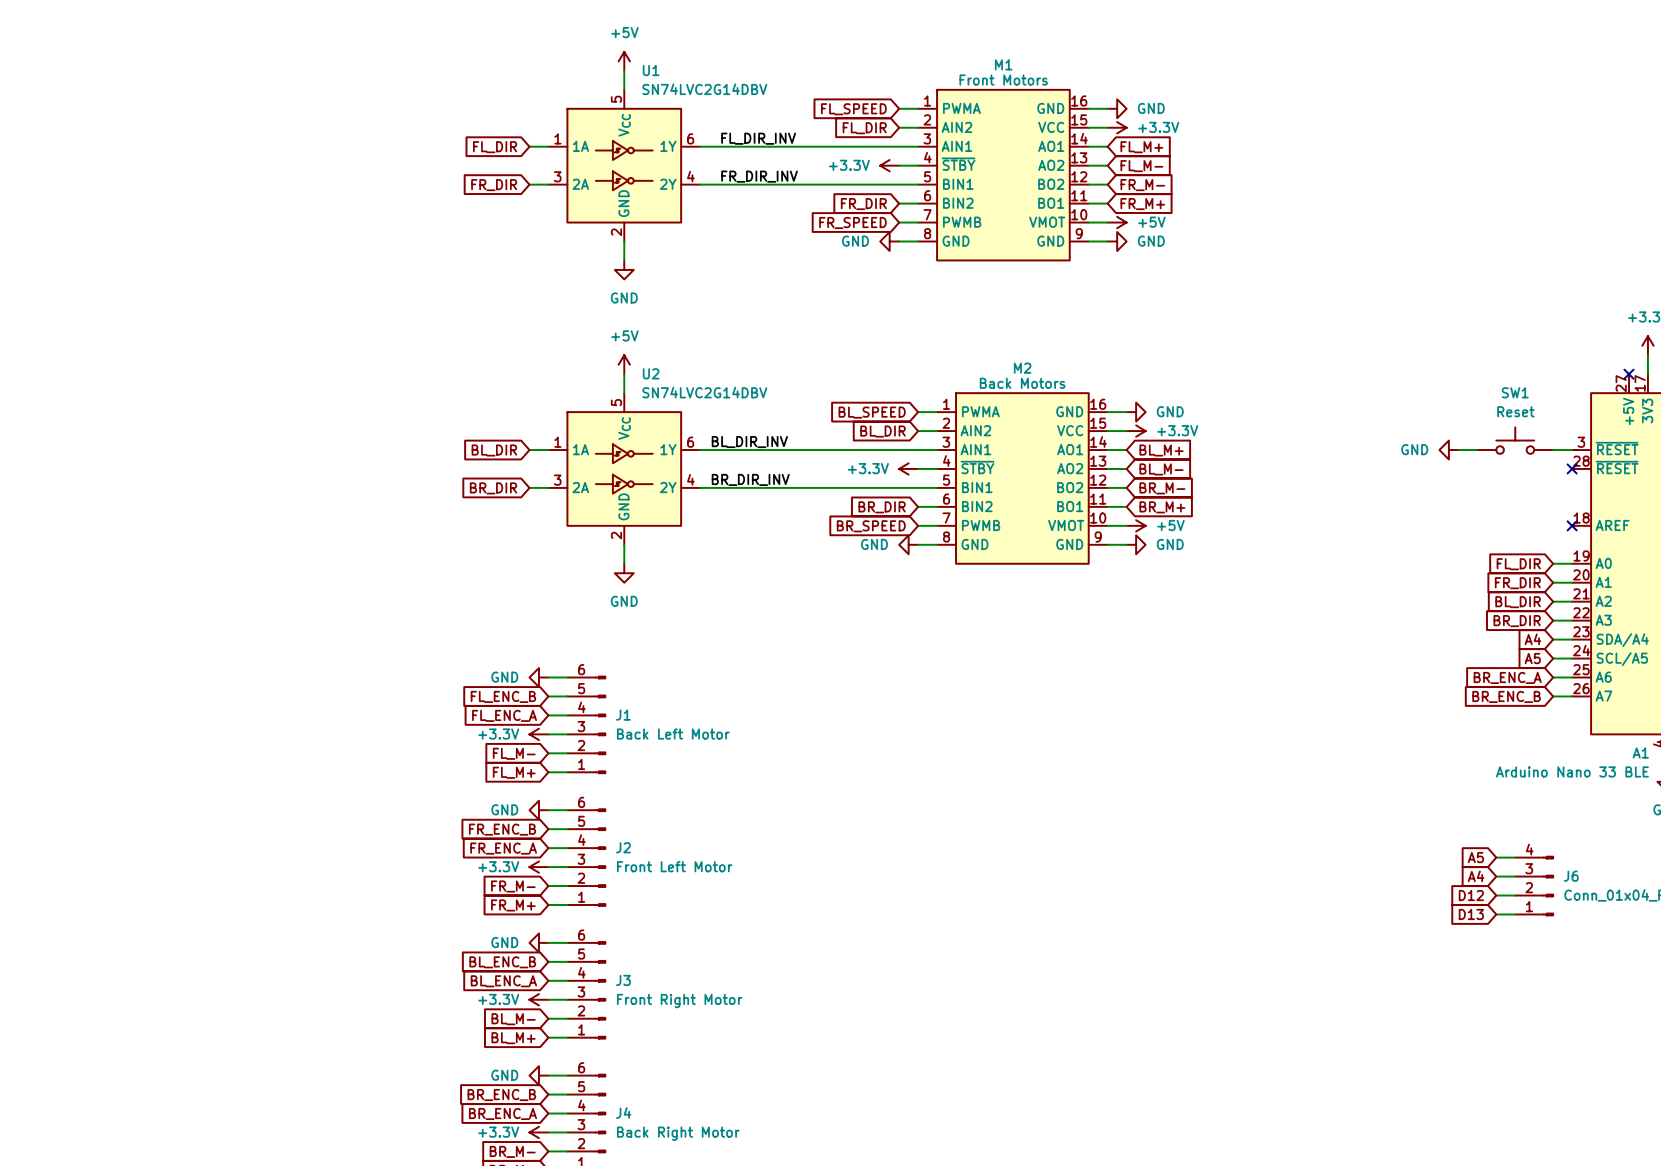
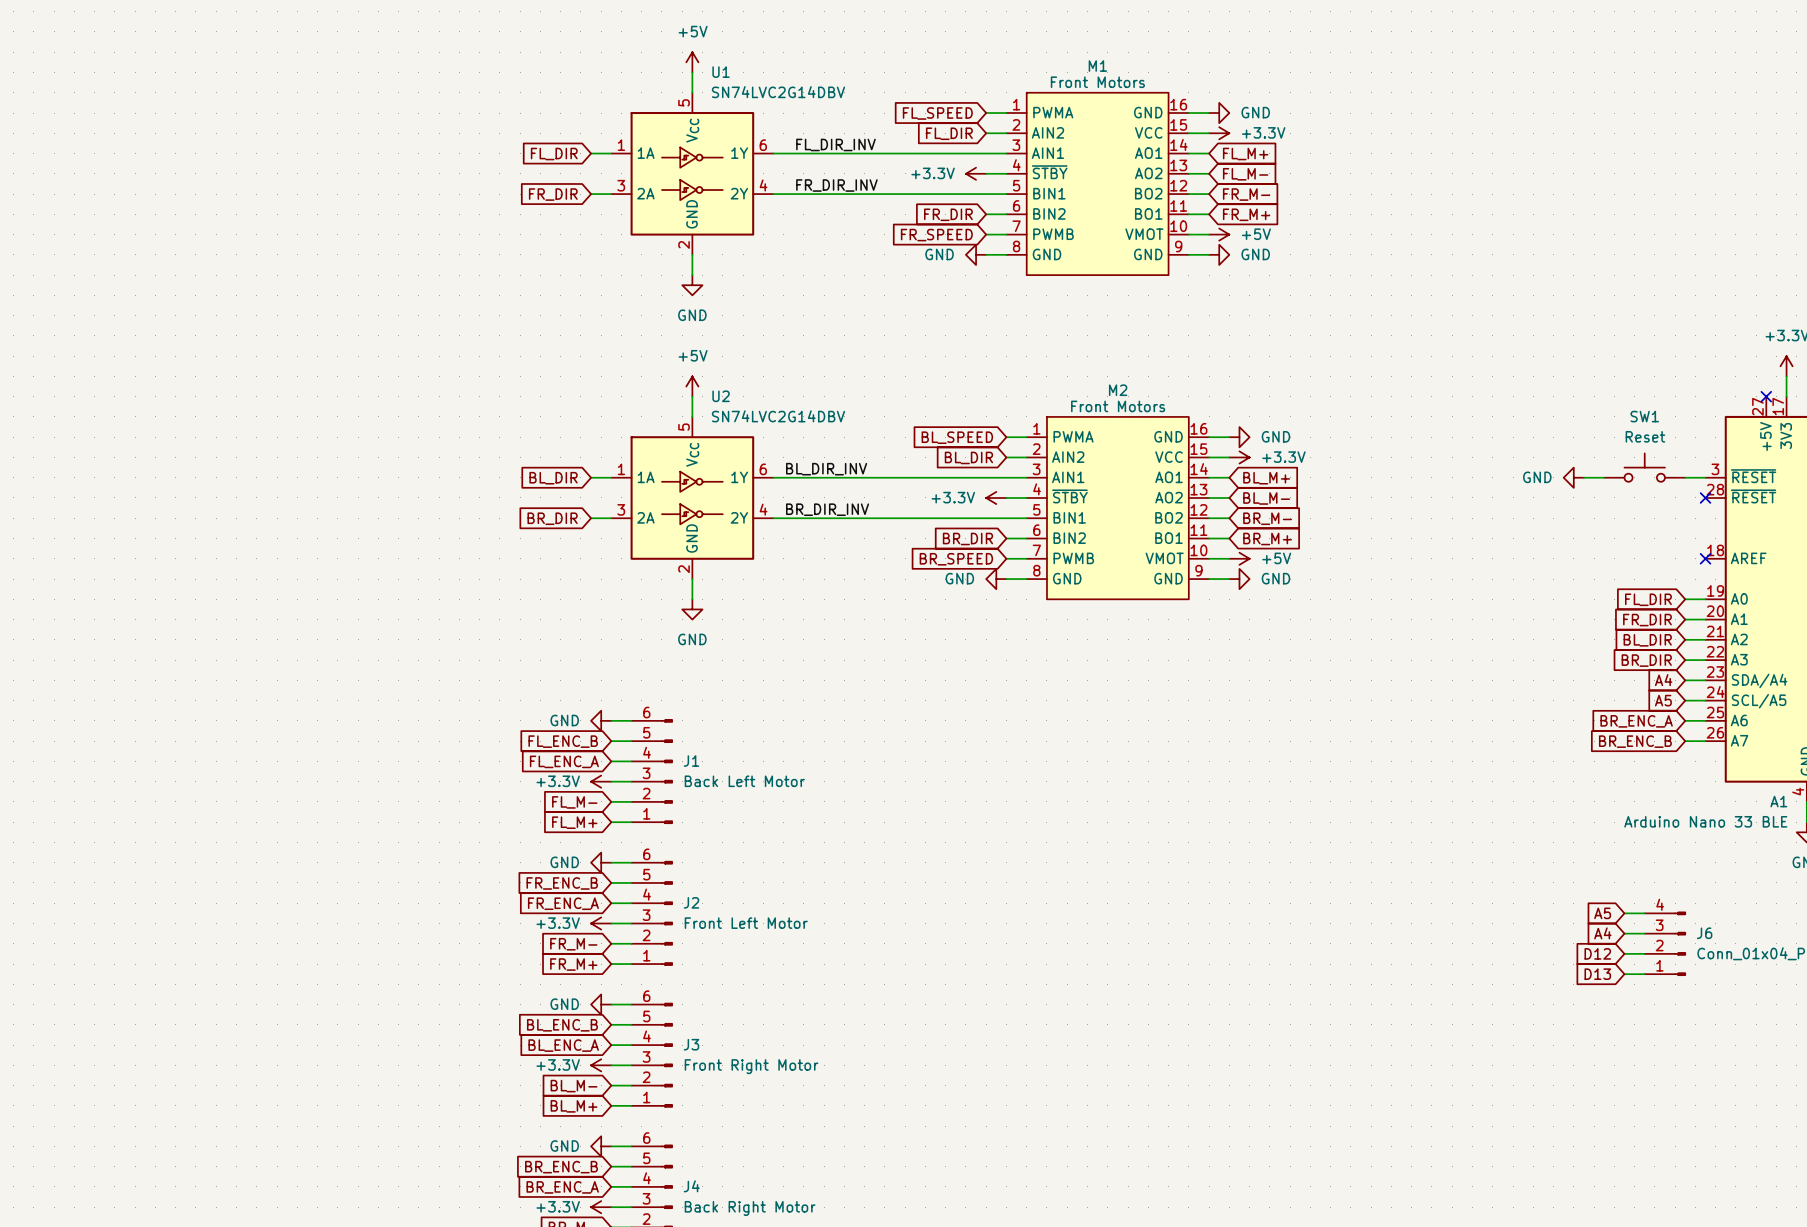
M2 value: Back Motors (1022, 383) -> Front Motors (1118, 406)

